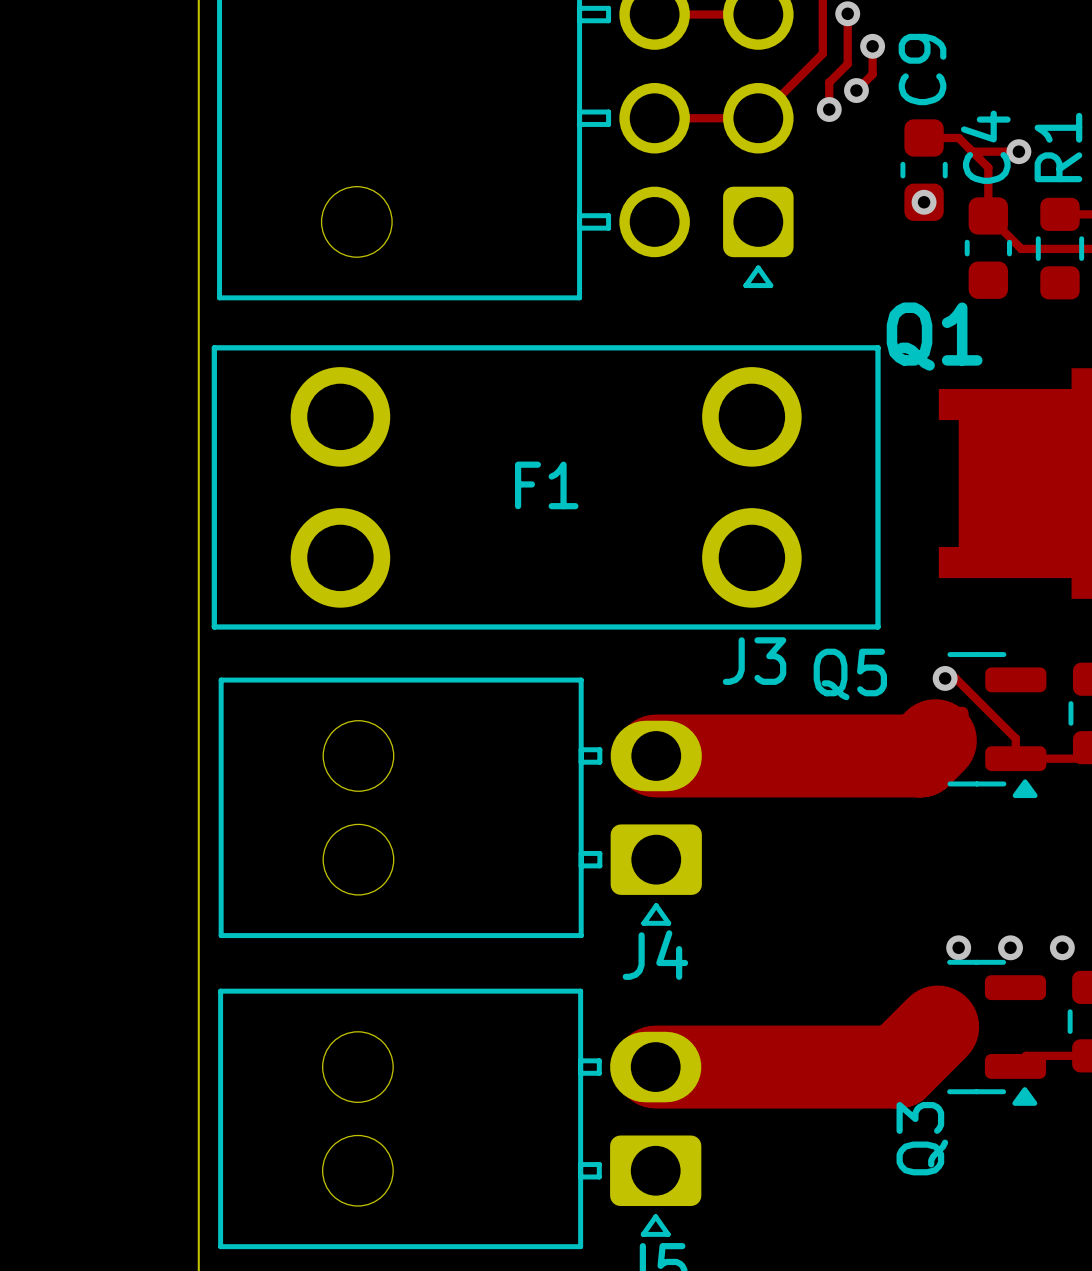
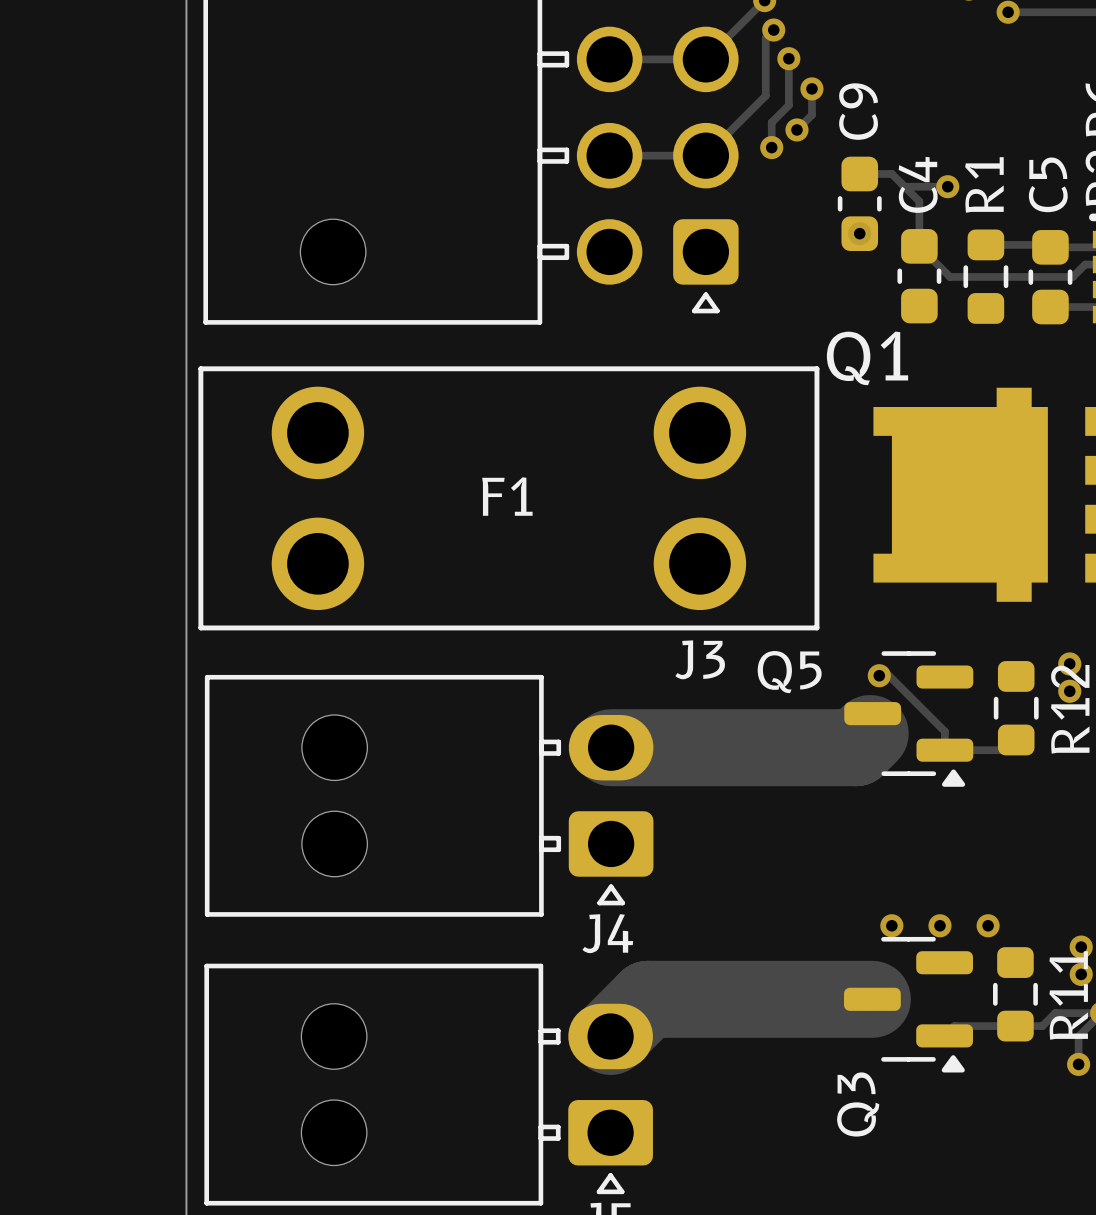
track: (937, 1027) (897, 1067) (655, 1067) -> (872, 999) (647, 999) (610, 1036)

